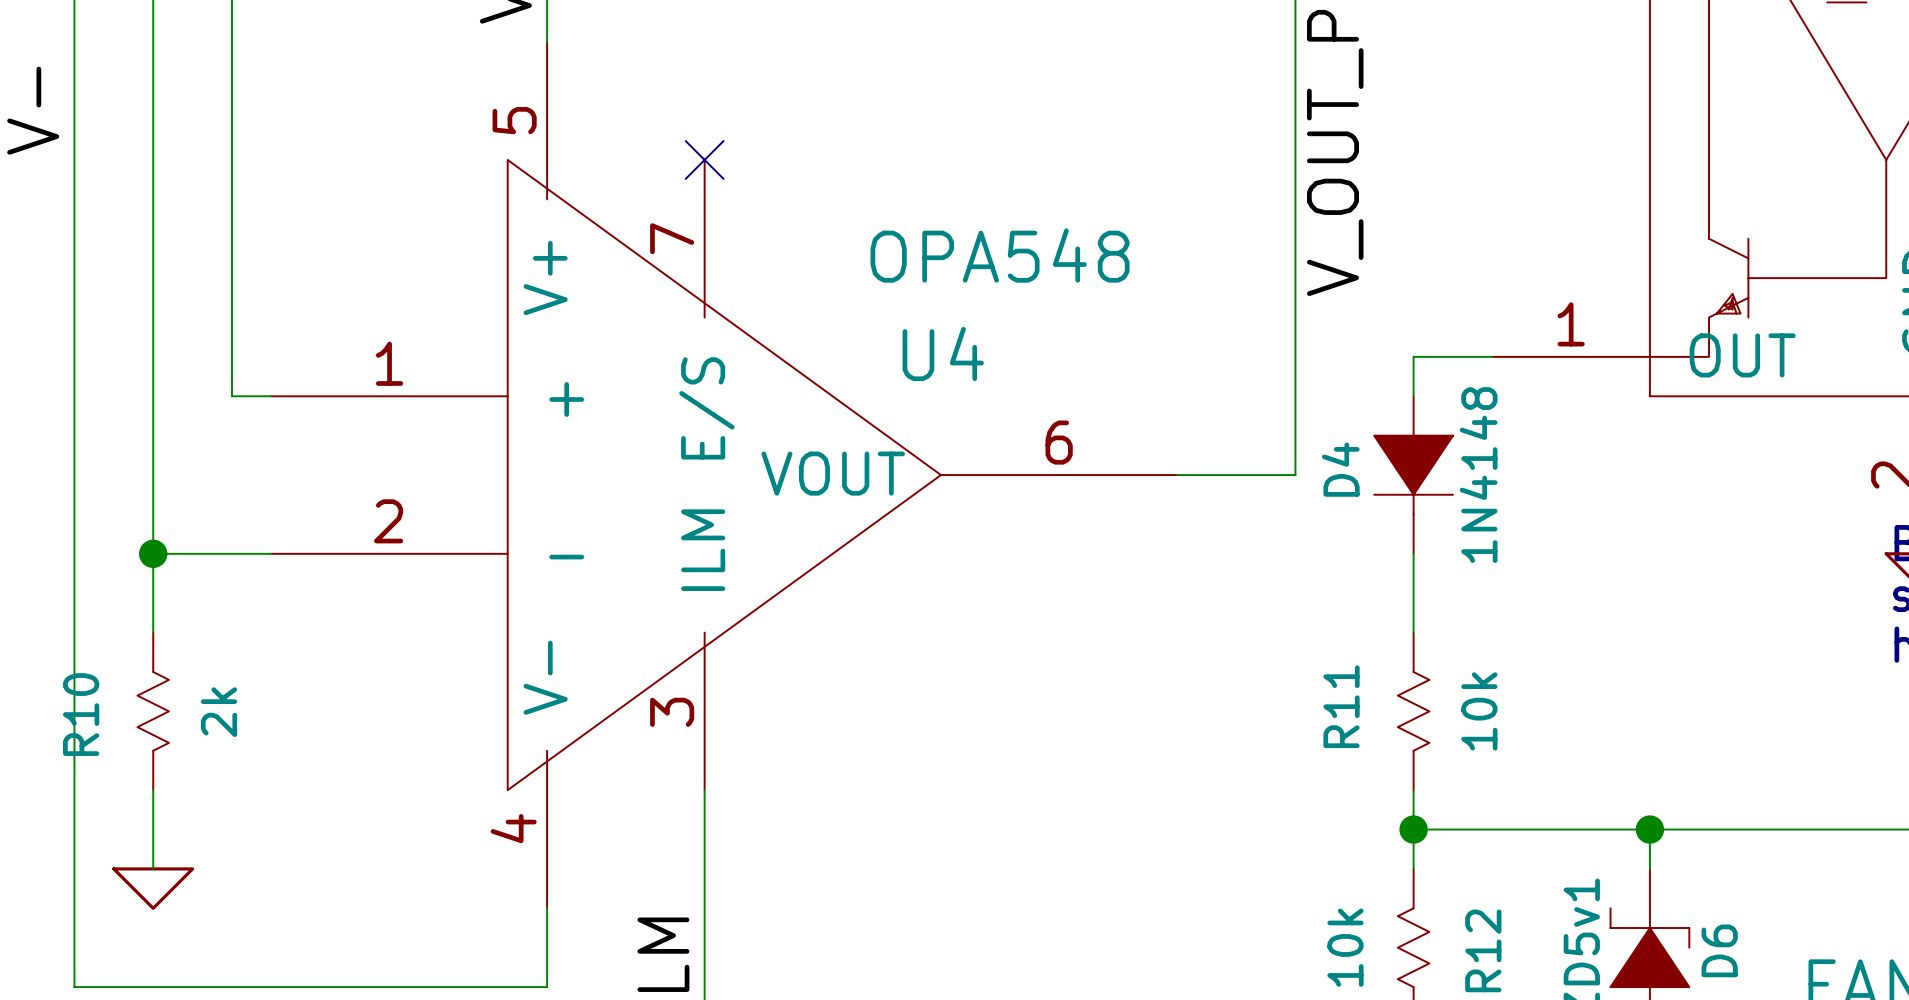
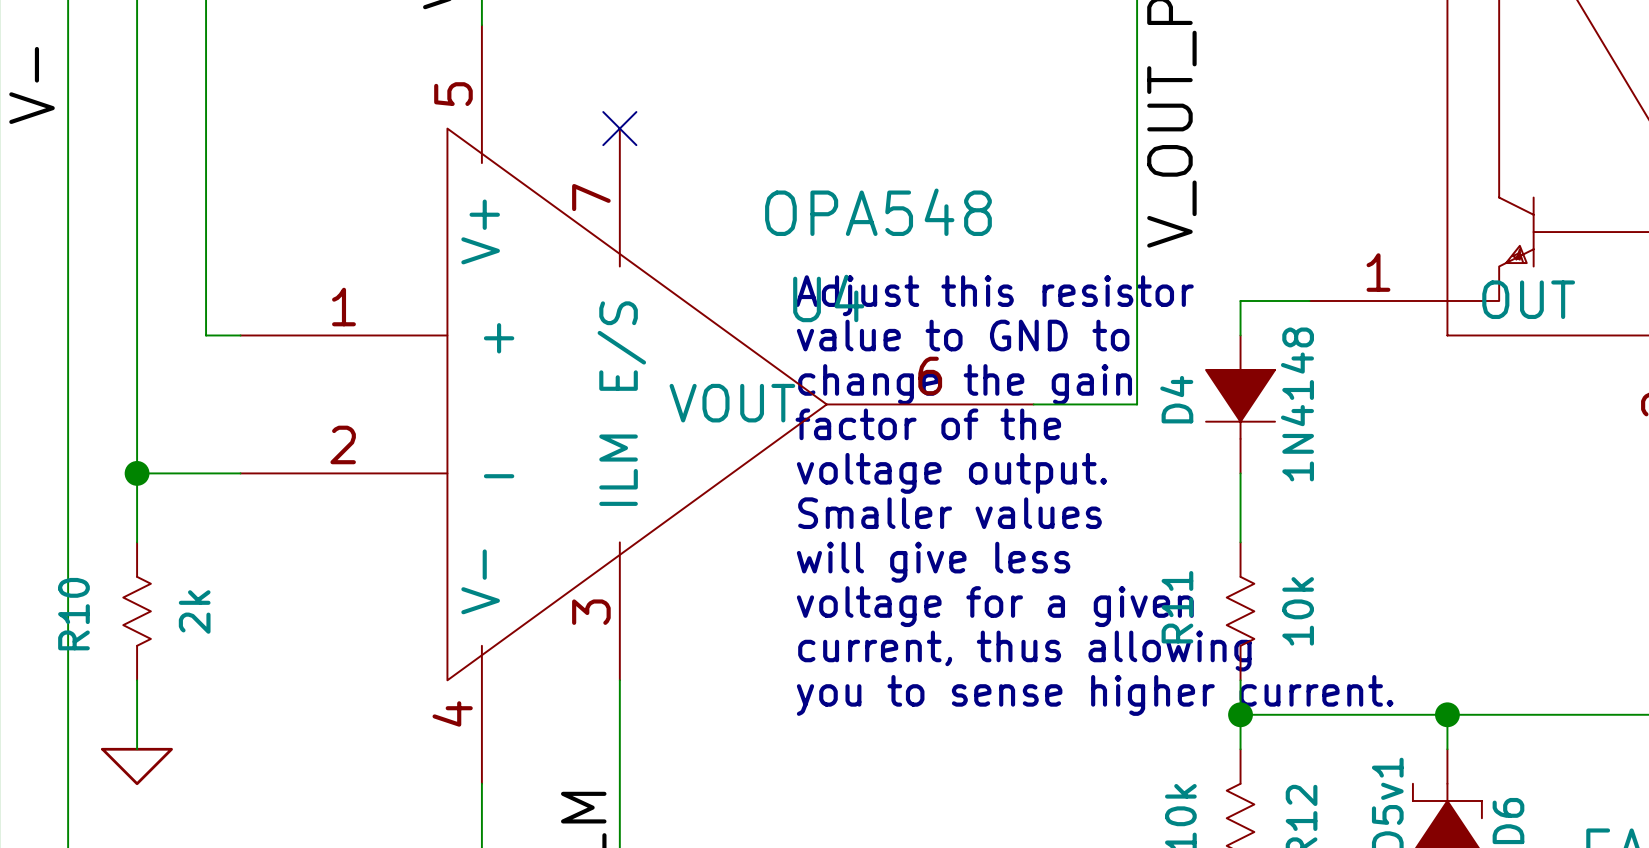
text: none -> Adjust this resistor (994, 295)
text: none -> value to GND to (963, 335)
text: none -> change the gain (965, 384)
text: none -> factor of the (928, 424)
text: none -> voltage output. (951, 473)
text: none -> Smaller values (949, 513)
text: none -> will give less (933, 562)
text: none -> voltage for a given (995, 606)
text: none -> current, thus allowing (1024, 651)
text: none -> you to sense higher current. (1095, 695)

